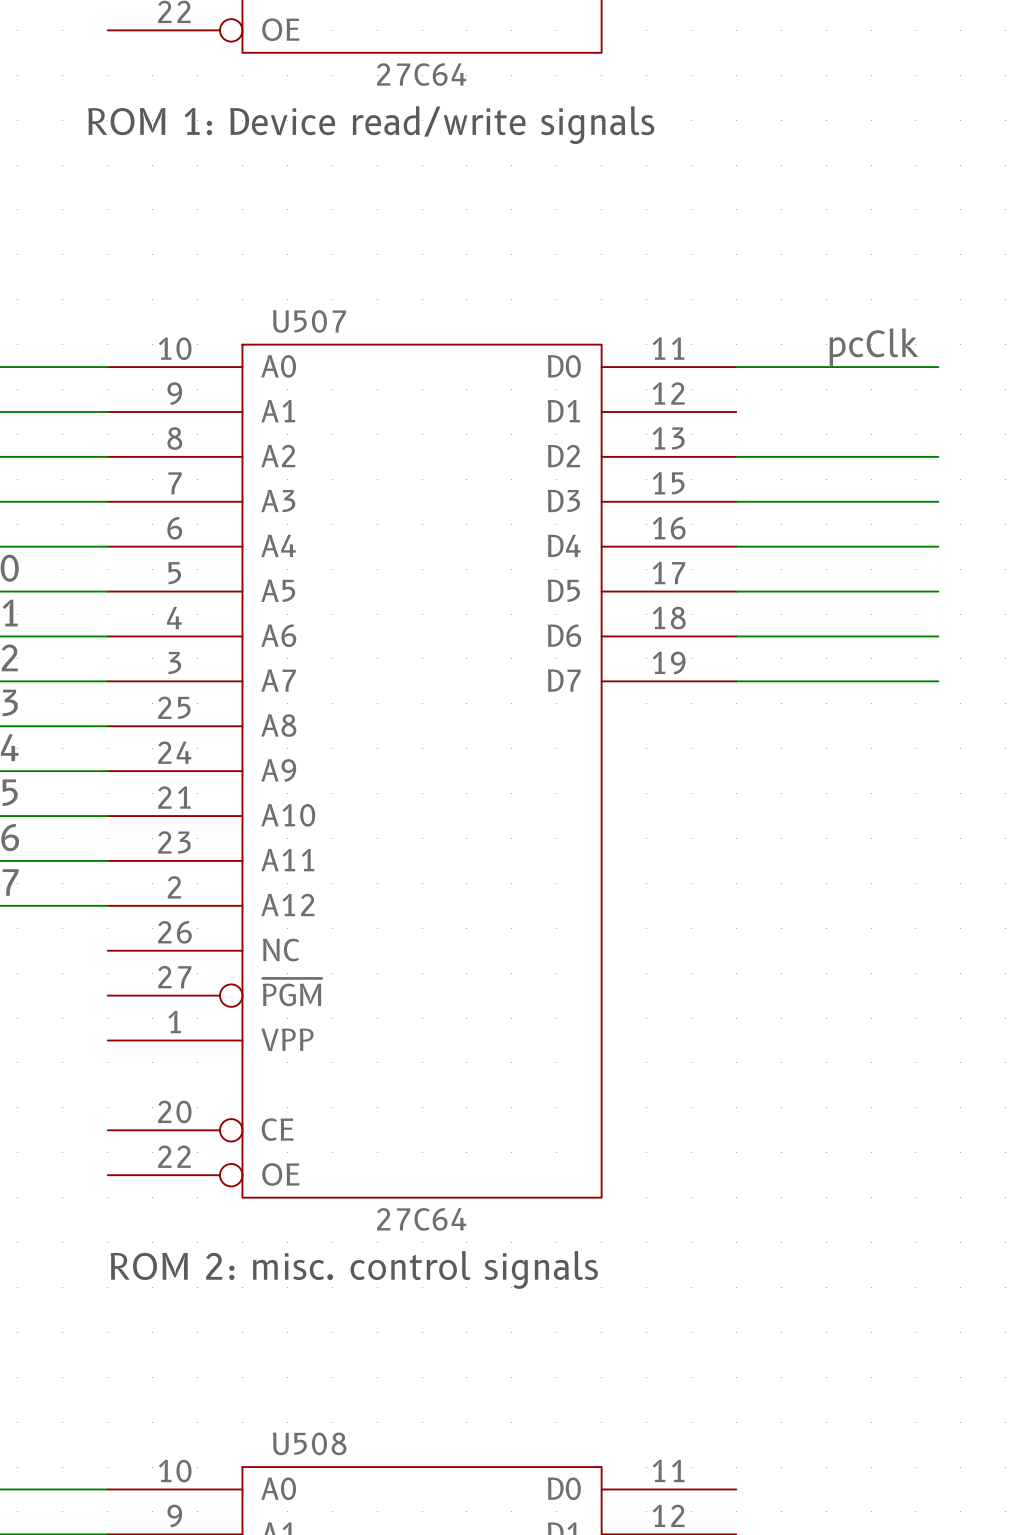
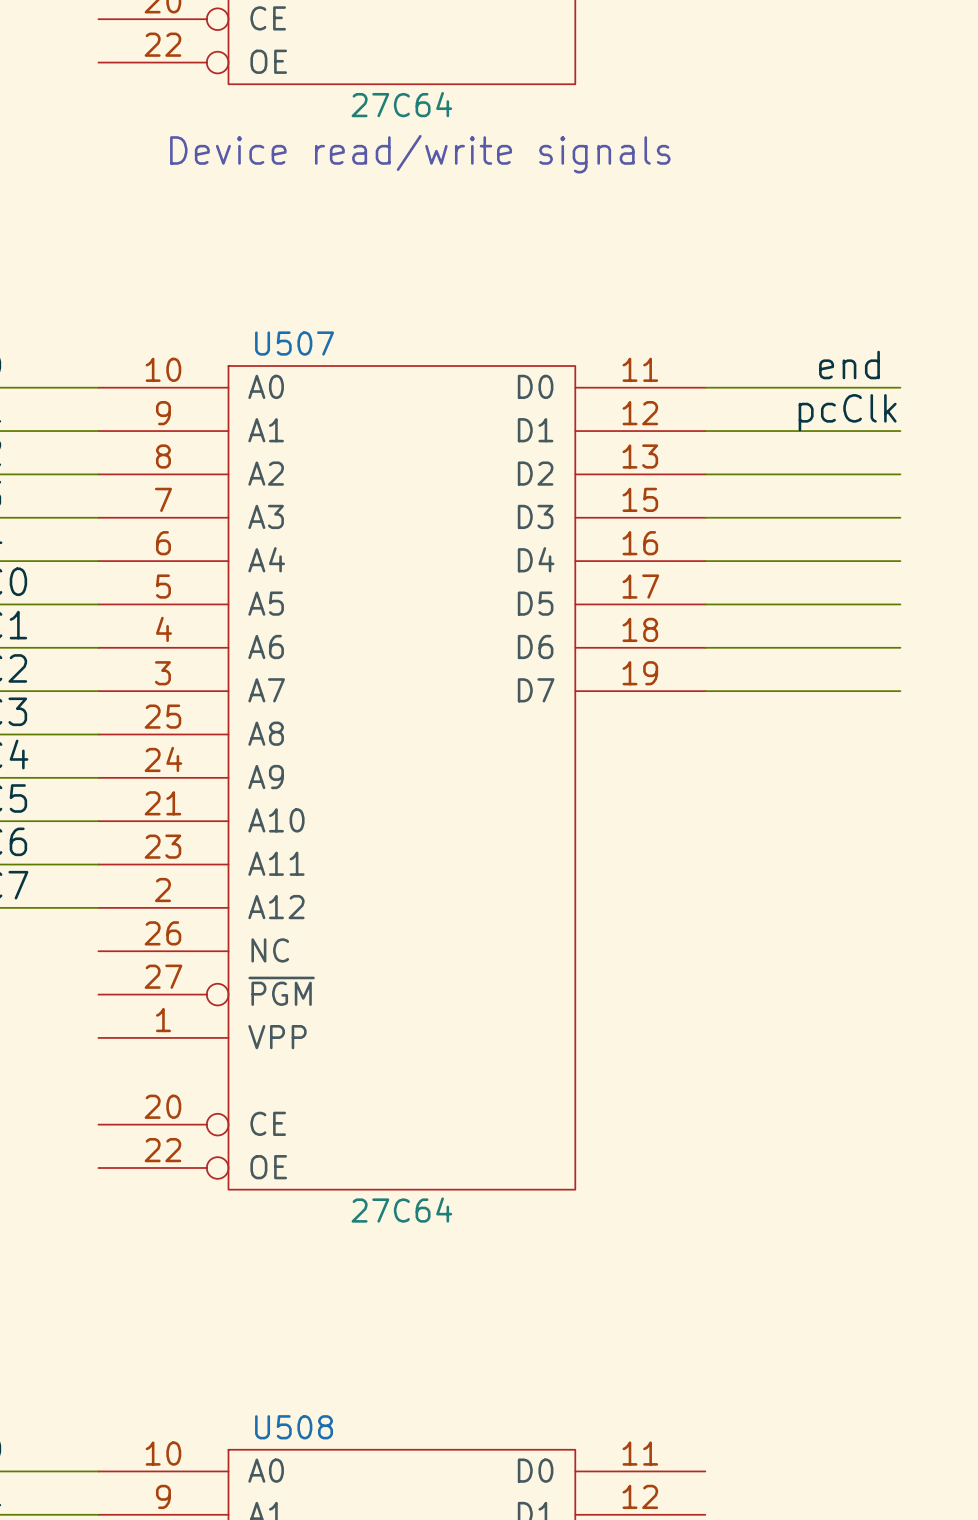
text: ROM 1: Device read/write signals (371, 125) -> Device read/write signals (420, 154)
label: none -> end (849, 365)
label position: pcClk (873, 347) -> pcClk (847, 412)
wire: none -> (705, 431) (900, 431)
text: ROM 2: misc. control signals (354, 1269) -> none

